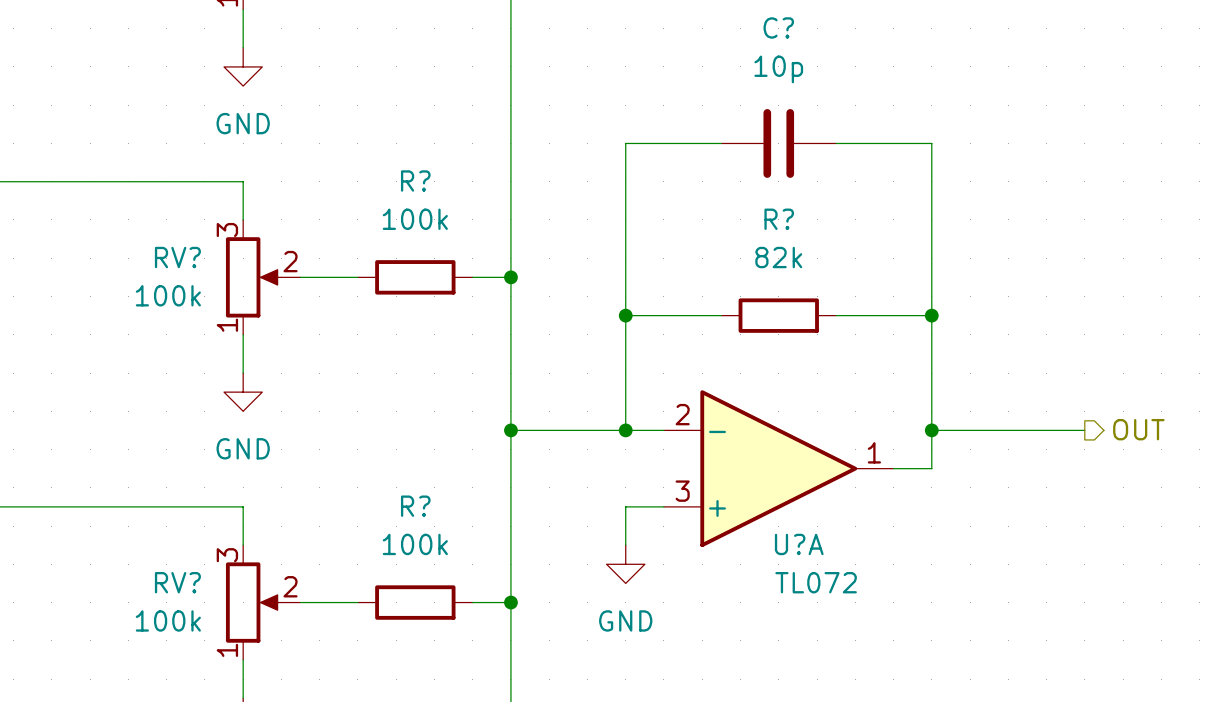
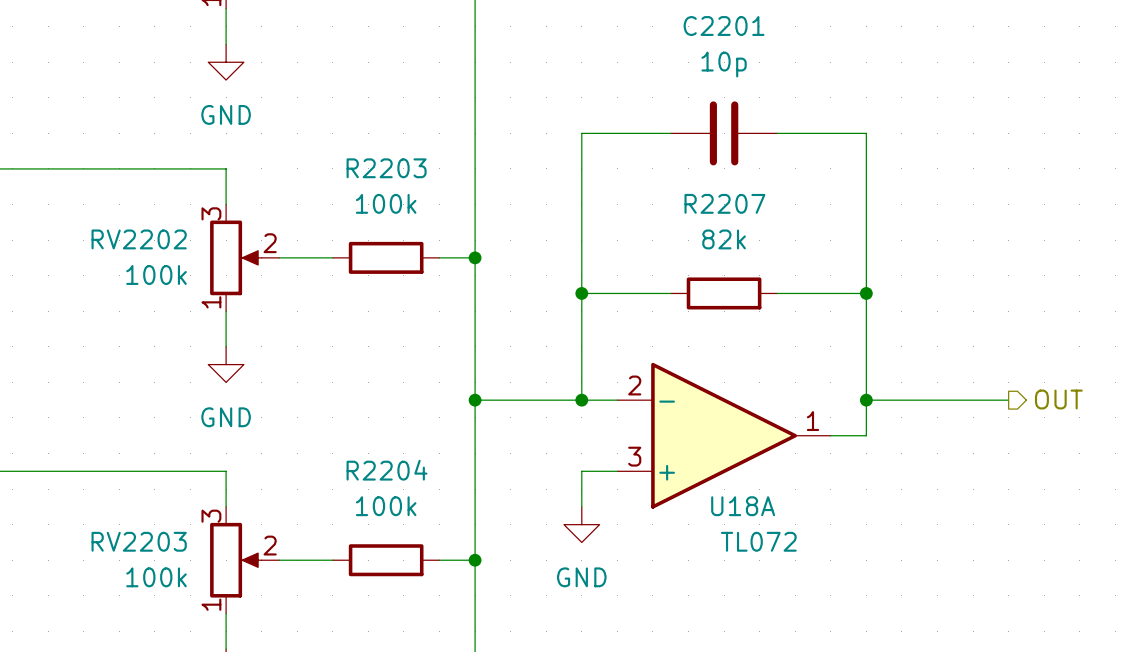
C? name: C? (778, 27) -> C2201 (724, 26)
R? name: R? (415, 181) -> R2203 (386, 168)
R? name: R? (779, 219) -> R2207 (724, 203)
RV? name: RV? (177, 257) -> RV2202 (139, 239)
R? name: R? (415, 506) -> R2204 (387, 470)
U?A name: U?A (799, 544) -> U18A (743, 506)
RV? name: RV? (177, 582) -> RV2203 (139, 541)

